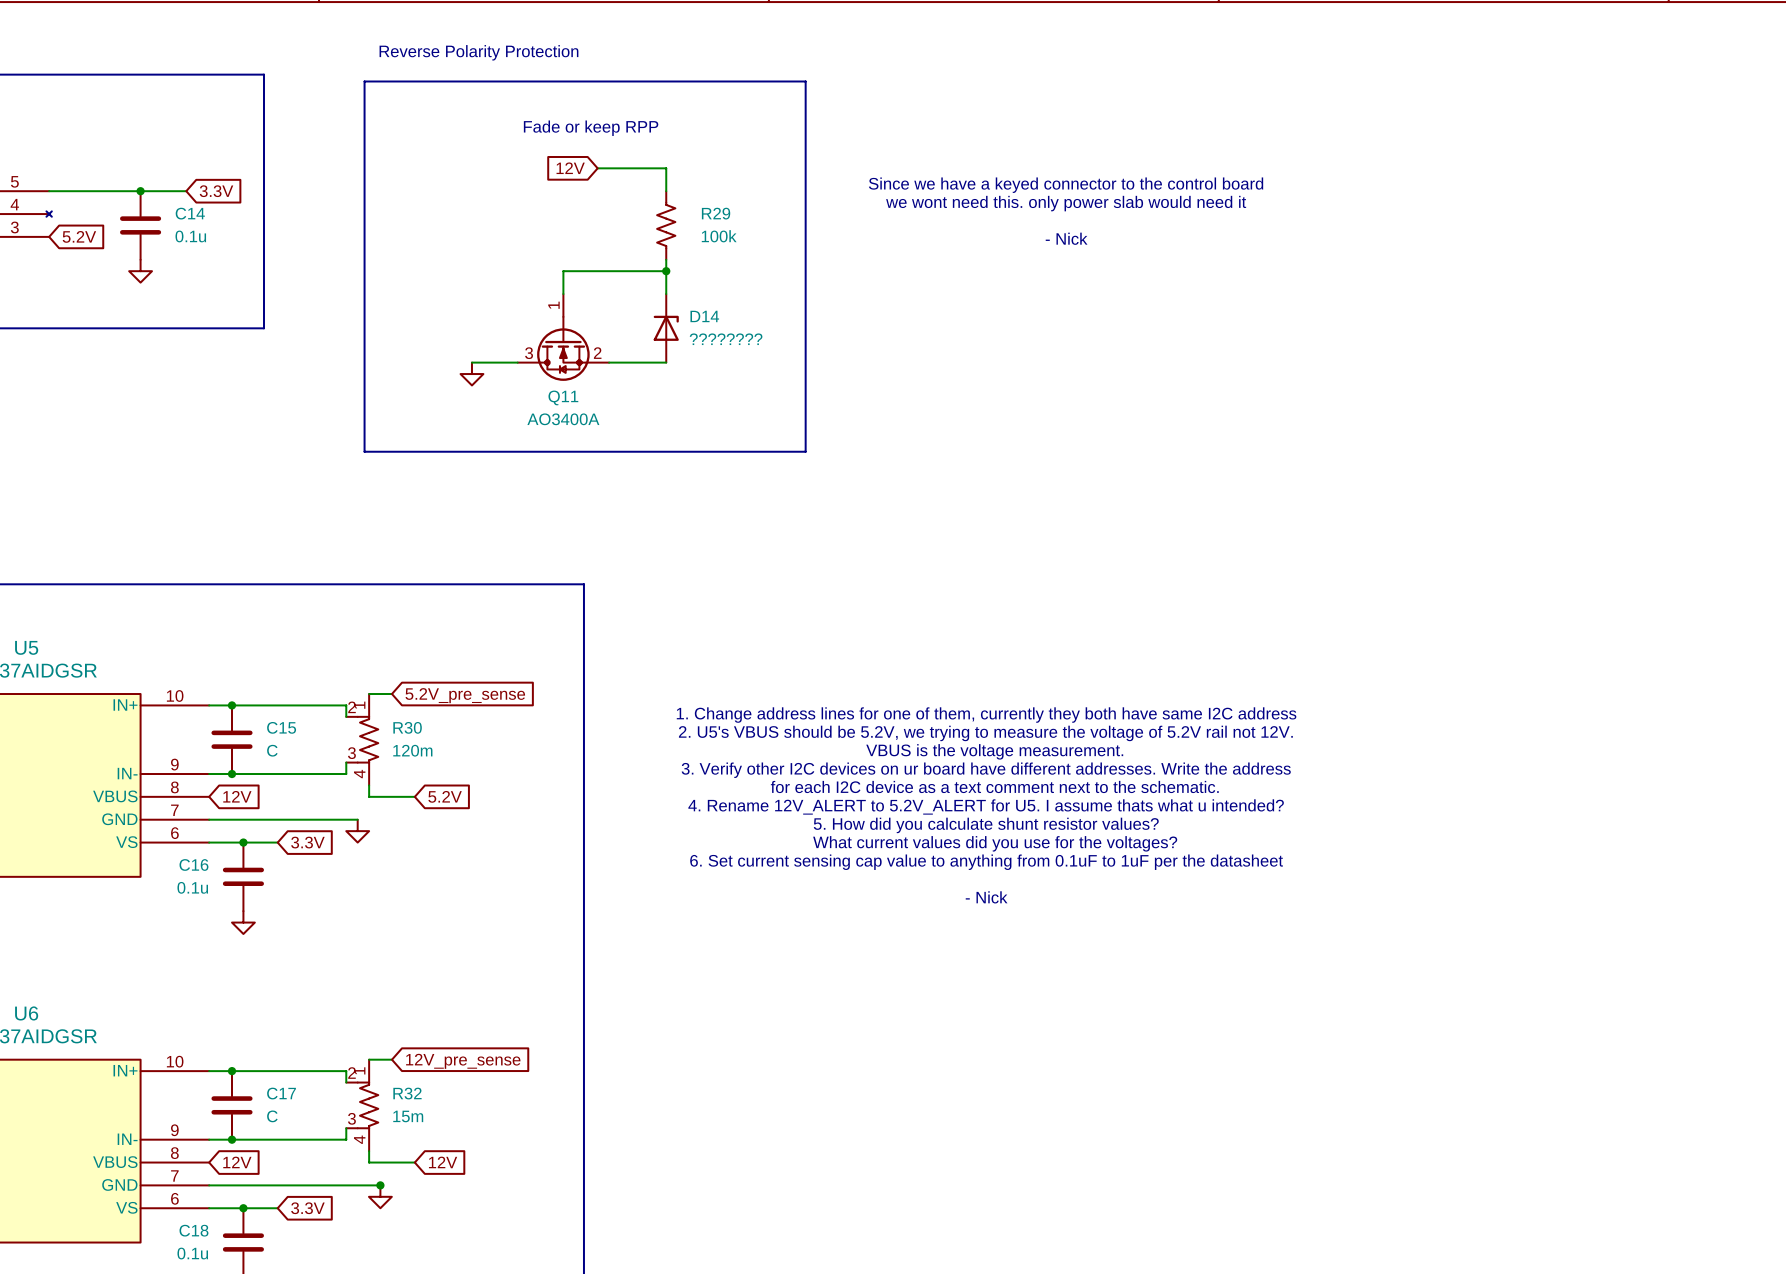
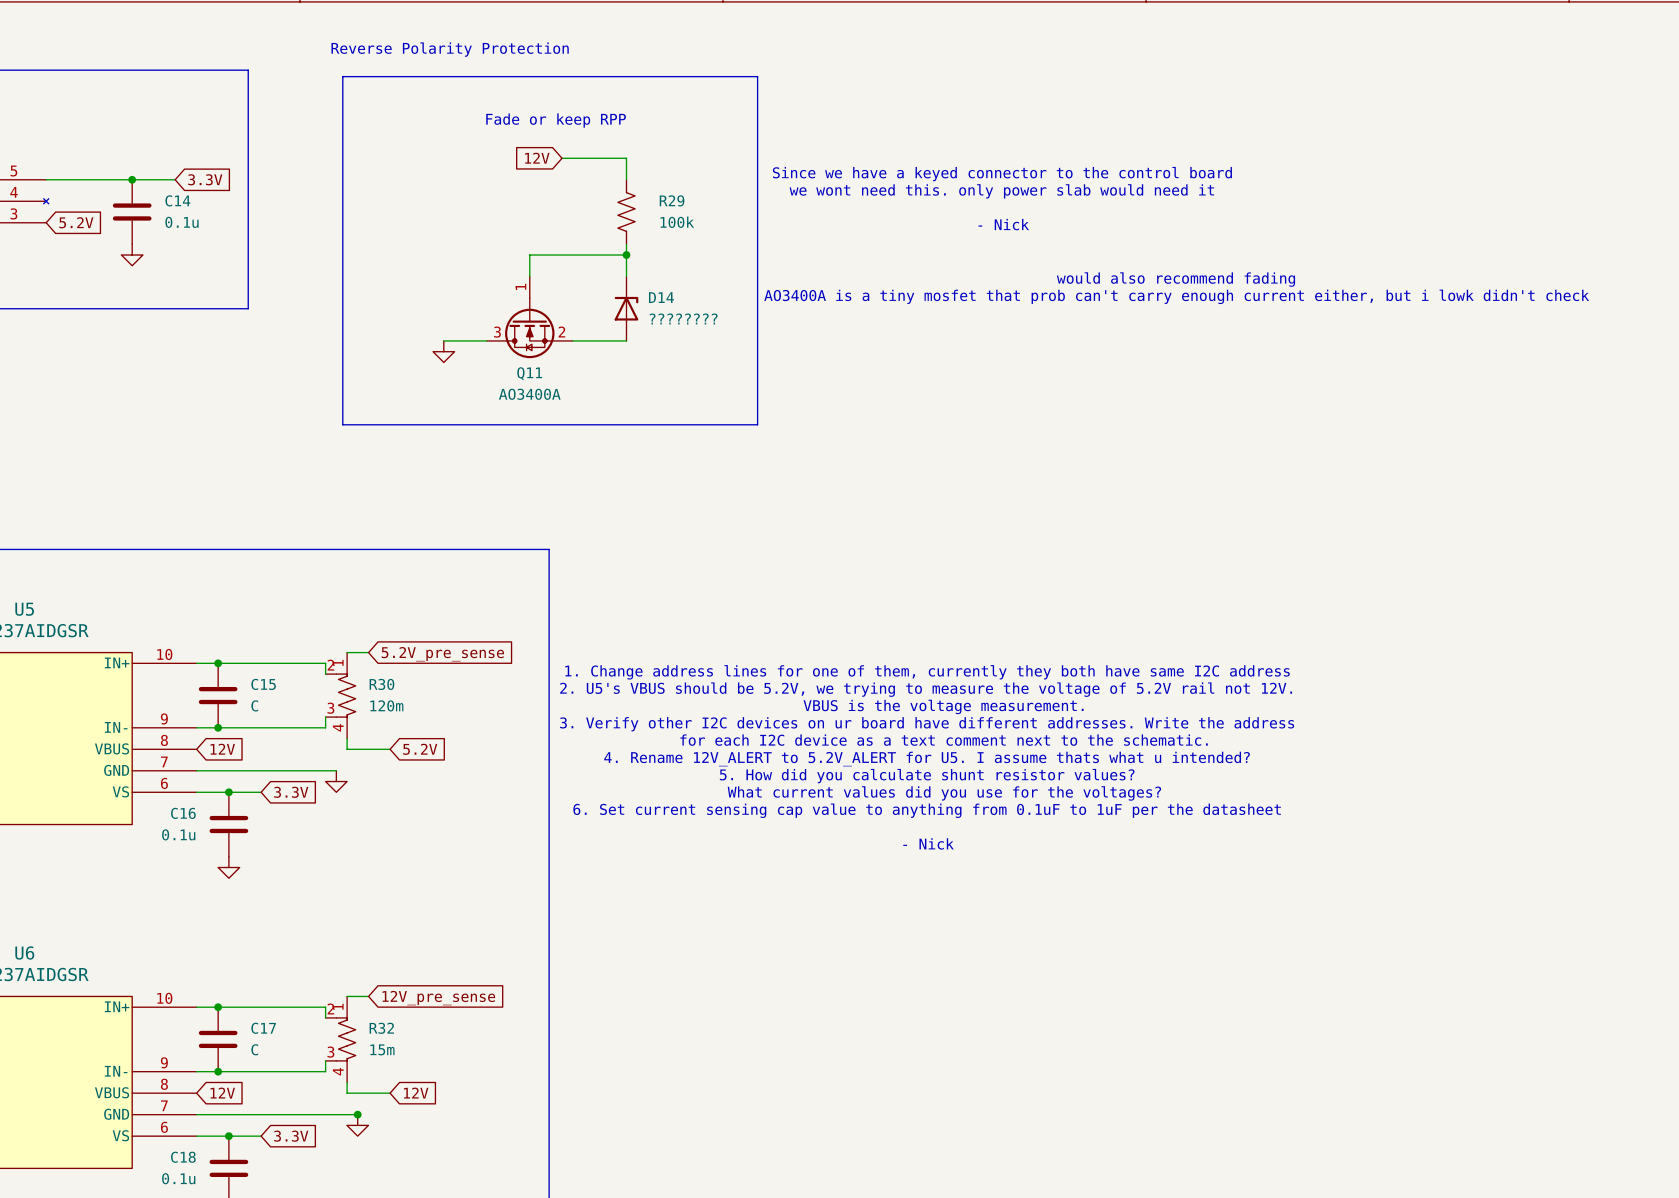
text: none -> would also recommend fading (1175, 279)
text: none -> AO3400A is a tiny mosfet that prob can't carry enough current either, but i lowk didn't check (1176, 296)

